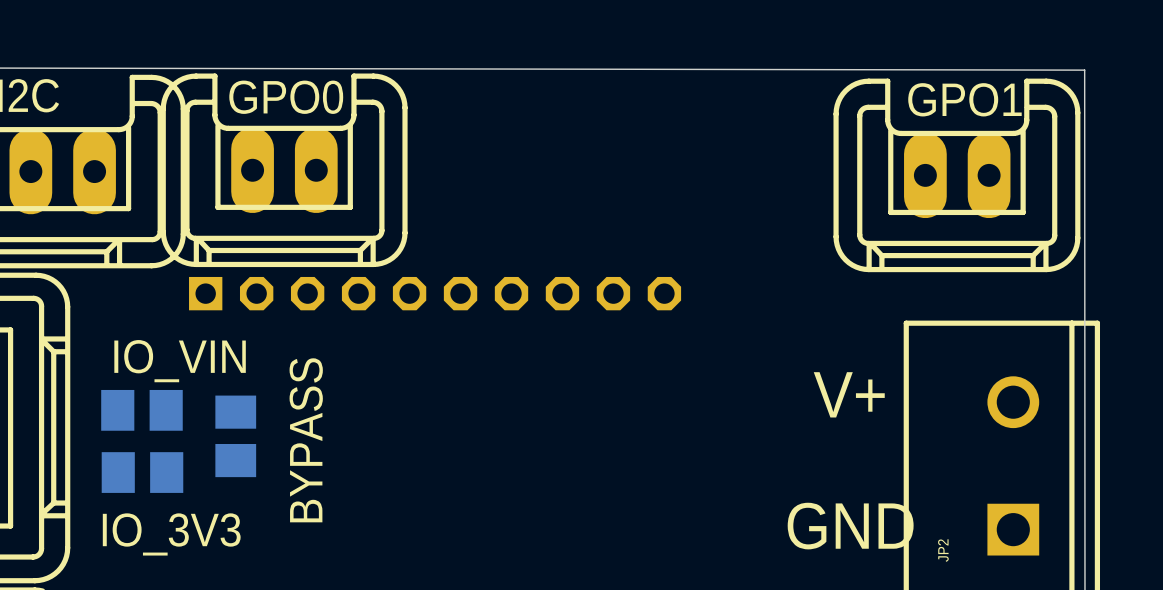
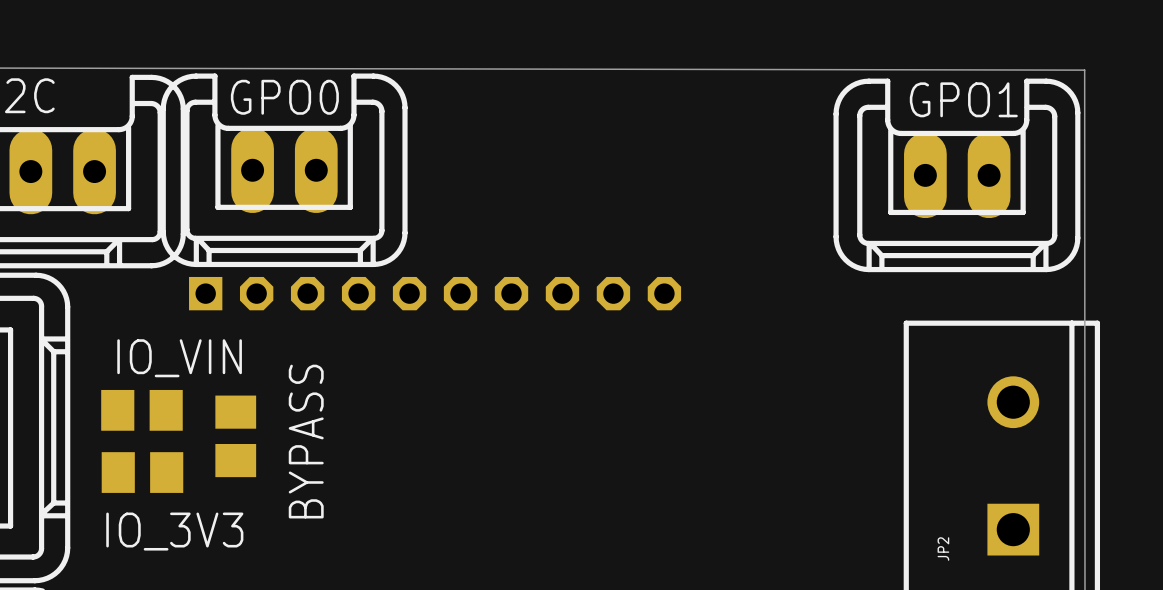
text: V+ (849, 394) -> none
text: GND (850, 526) -> none

